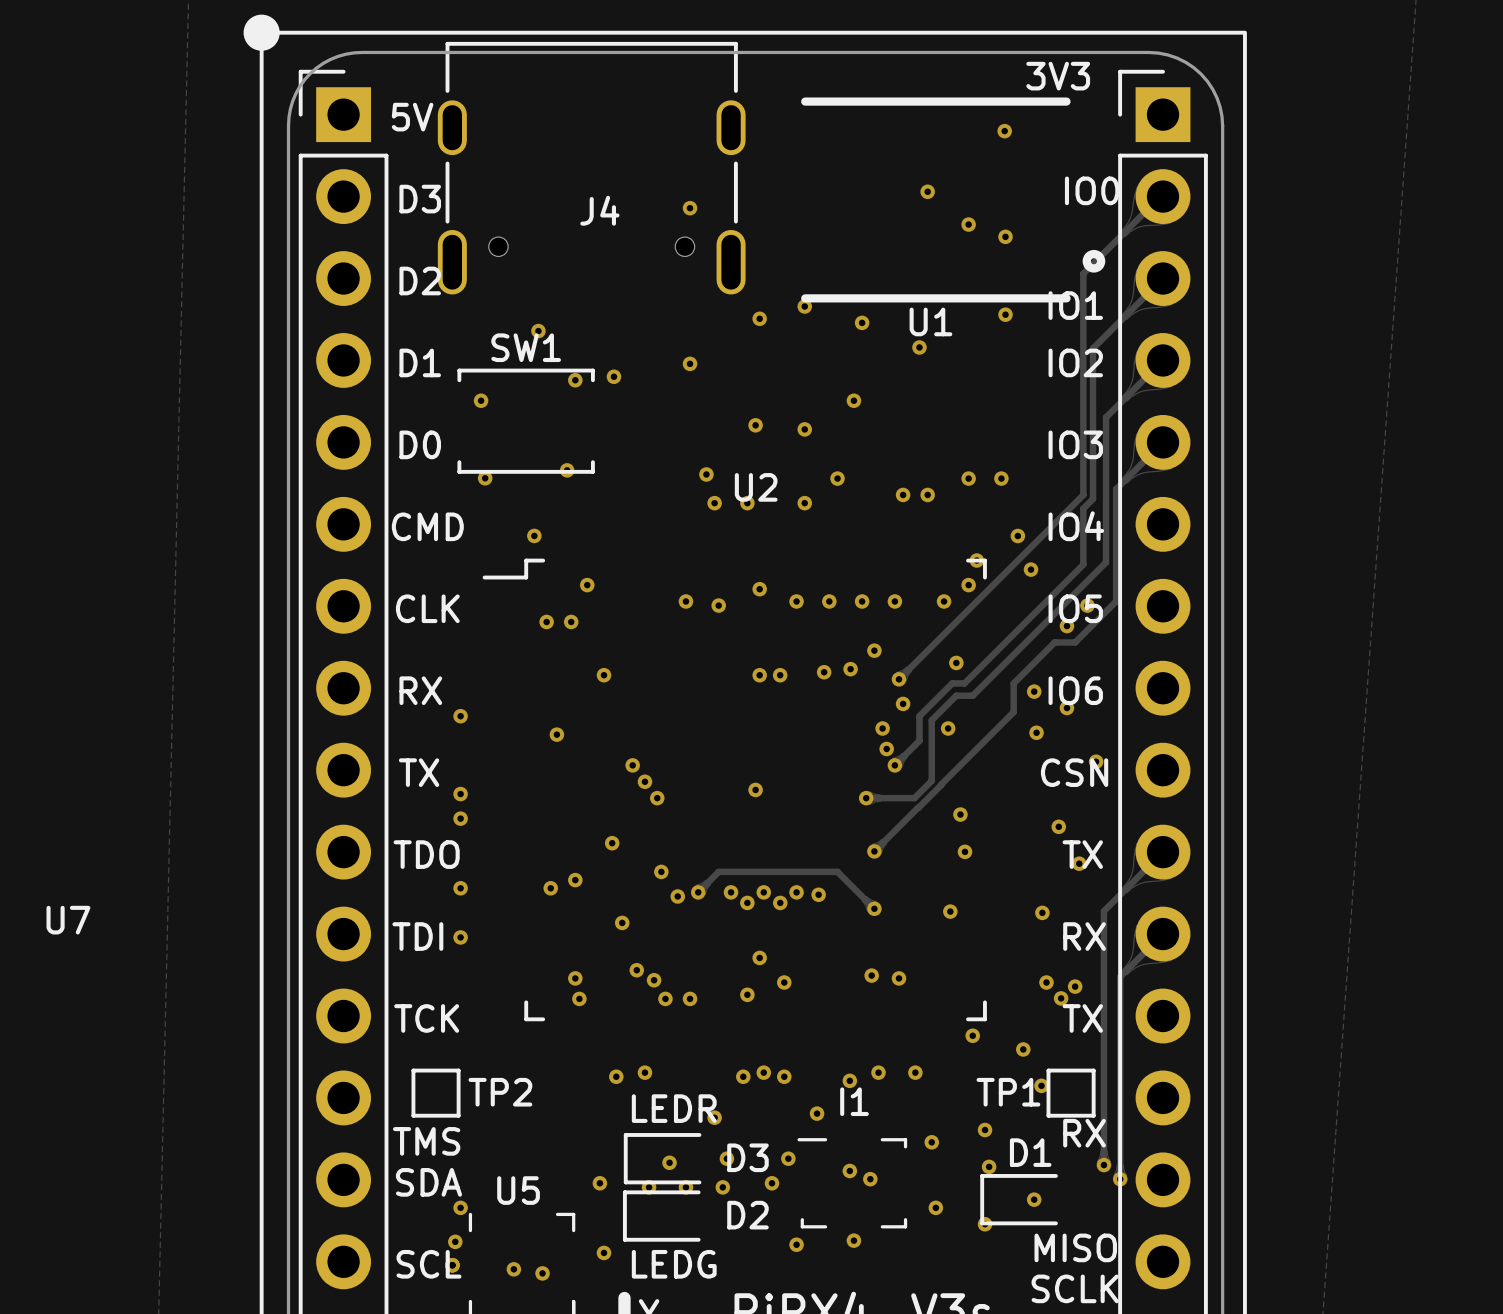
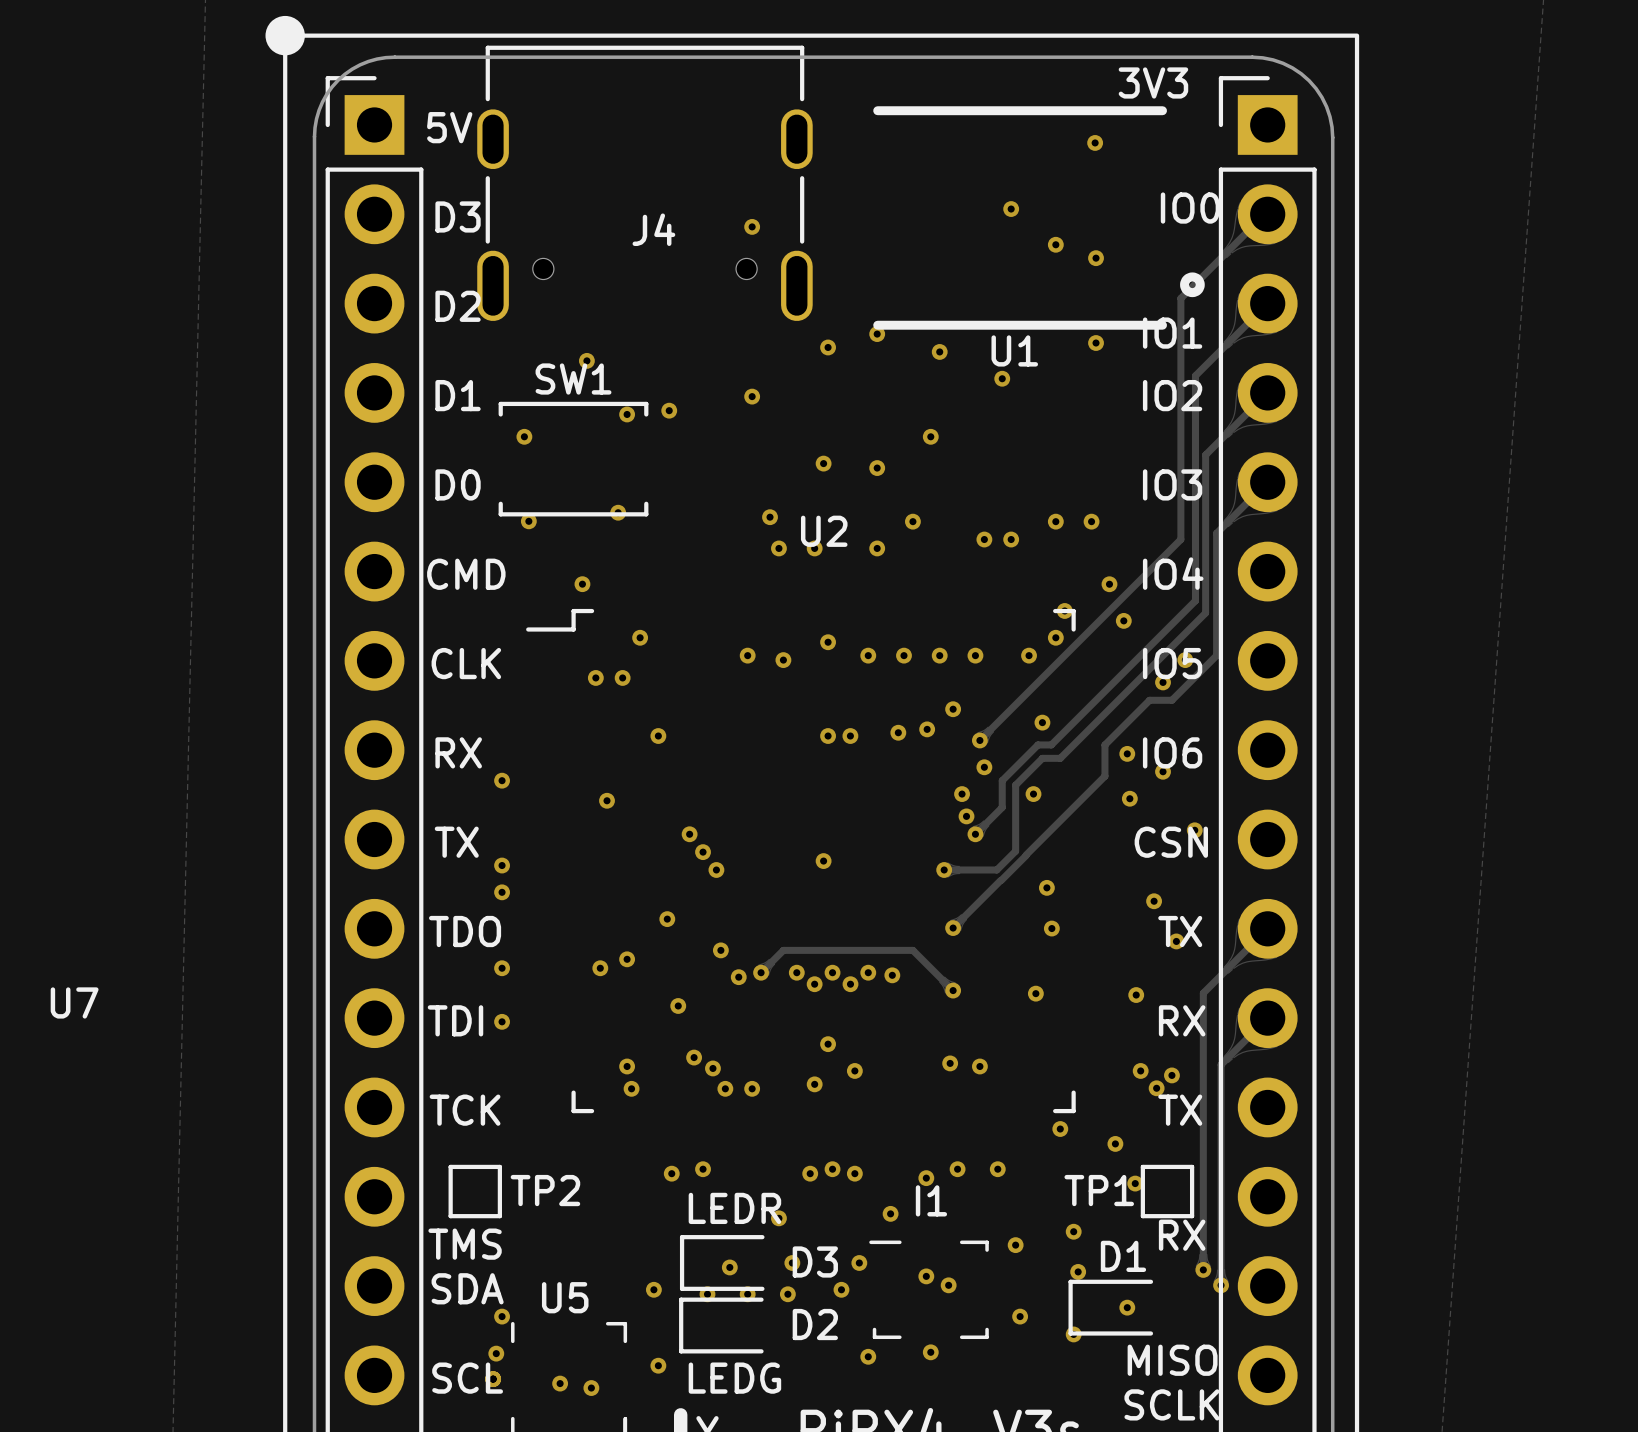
track: (1096, 344) (1093, 348) (1093, 498) (1083, 508) (1083, 564) -> (1195, 375) (1195, 600) (1180, 615)

